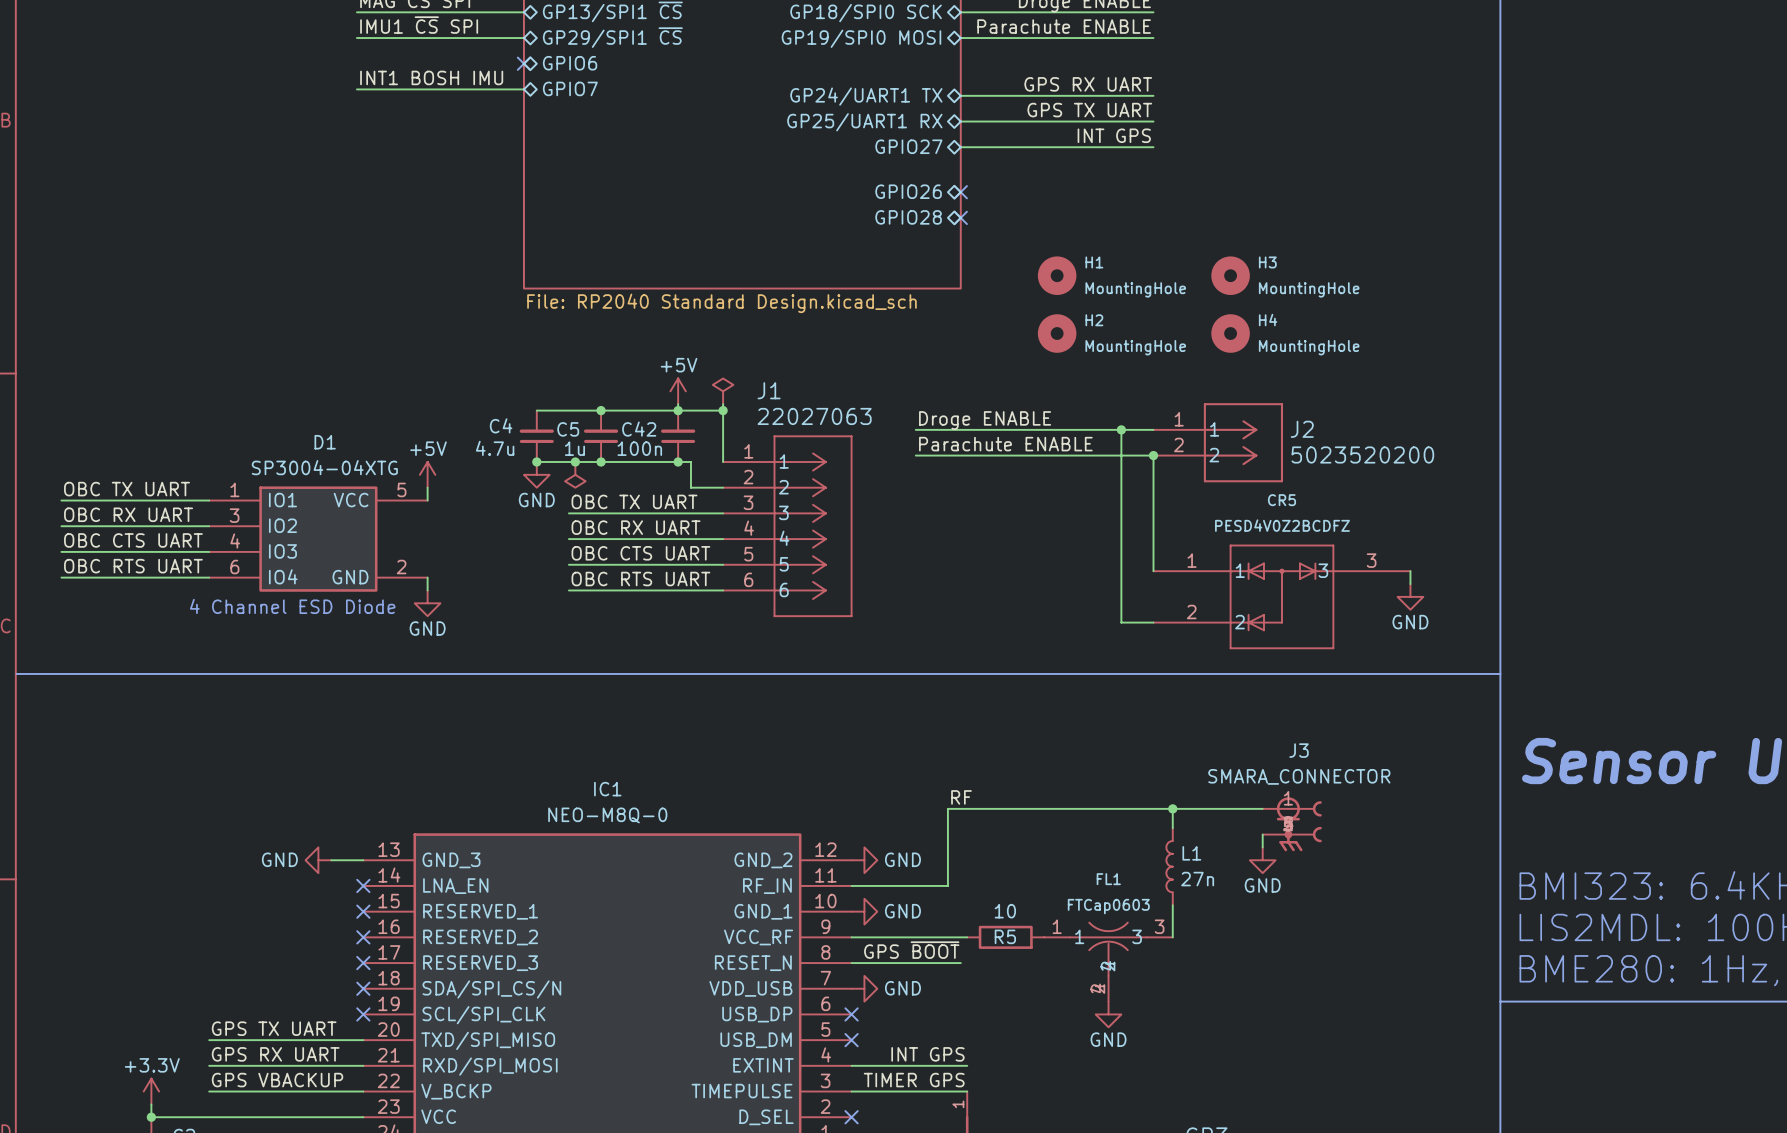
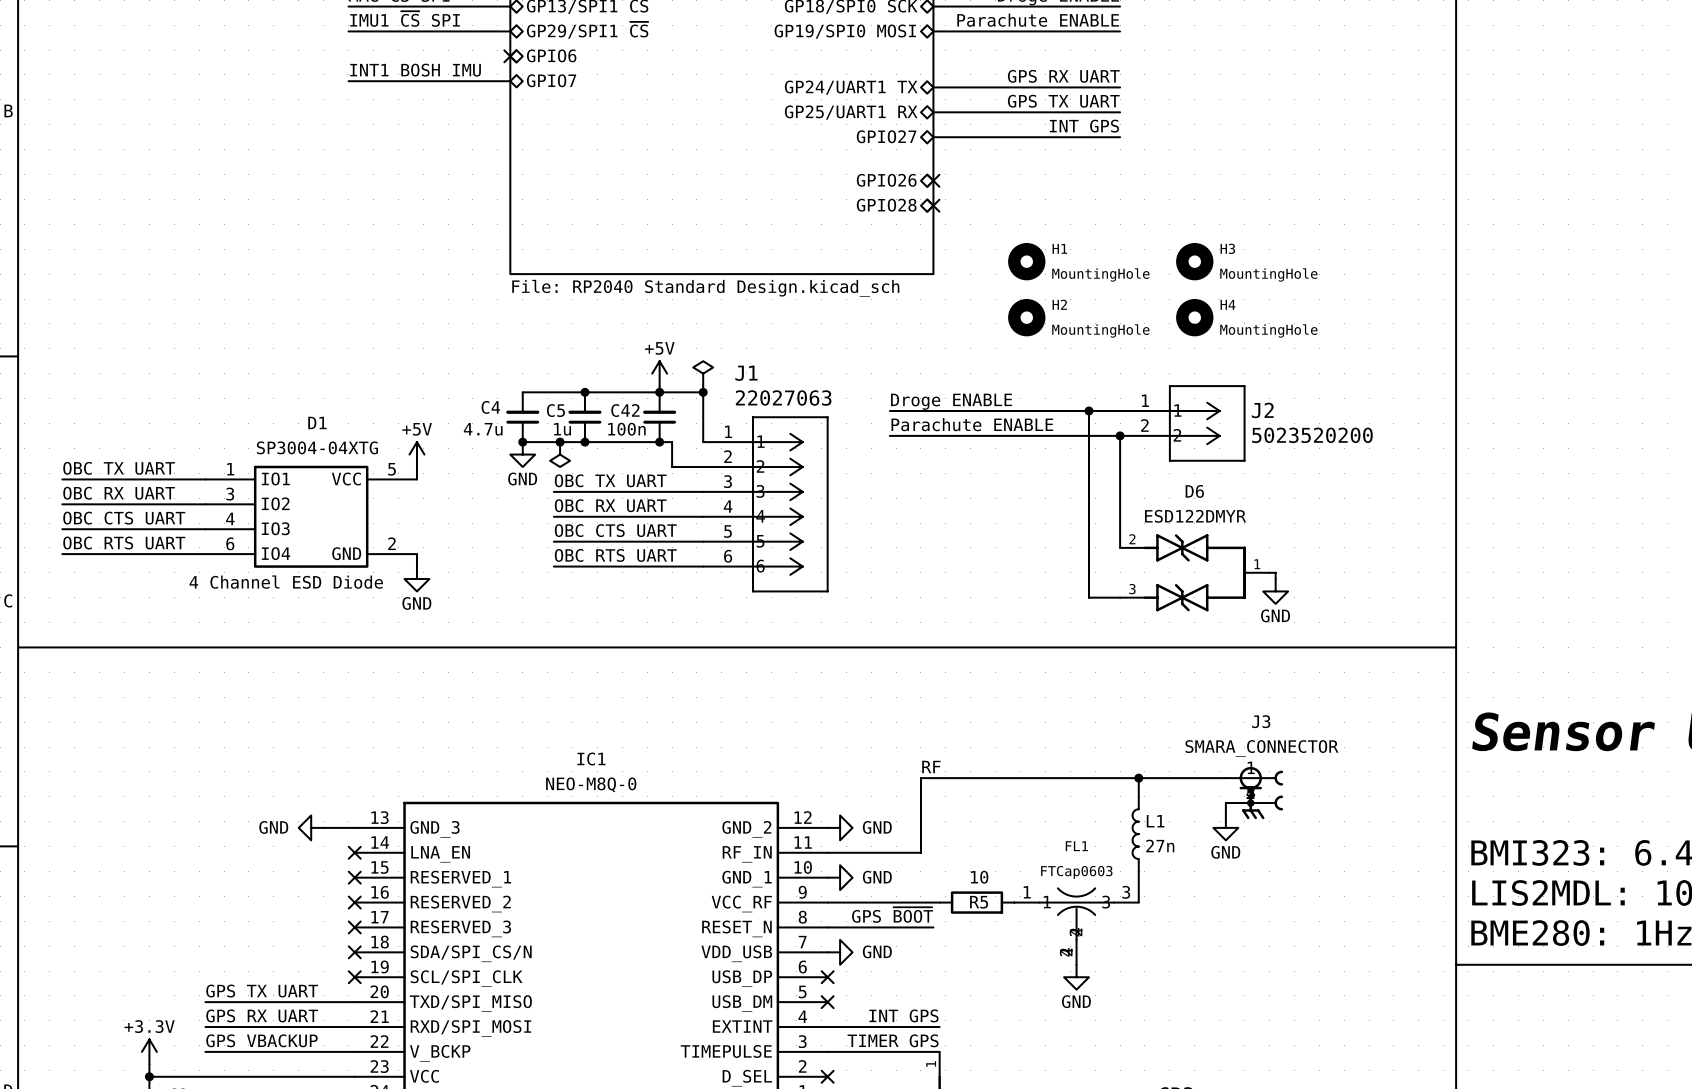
wire: (1410, 571) (1410, 584) -> none
D6: none -> ESD122DMYR (1194, 572)
CR5: PESD4V0Z2BCDFZ (1281, 596) -> none
wire: none -> (1269, 572) (1275, 572) (1275, 579)
power symbol position: GND (1410, 596) -> GND (1275, 591)

